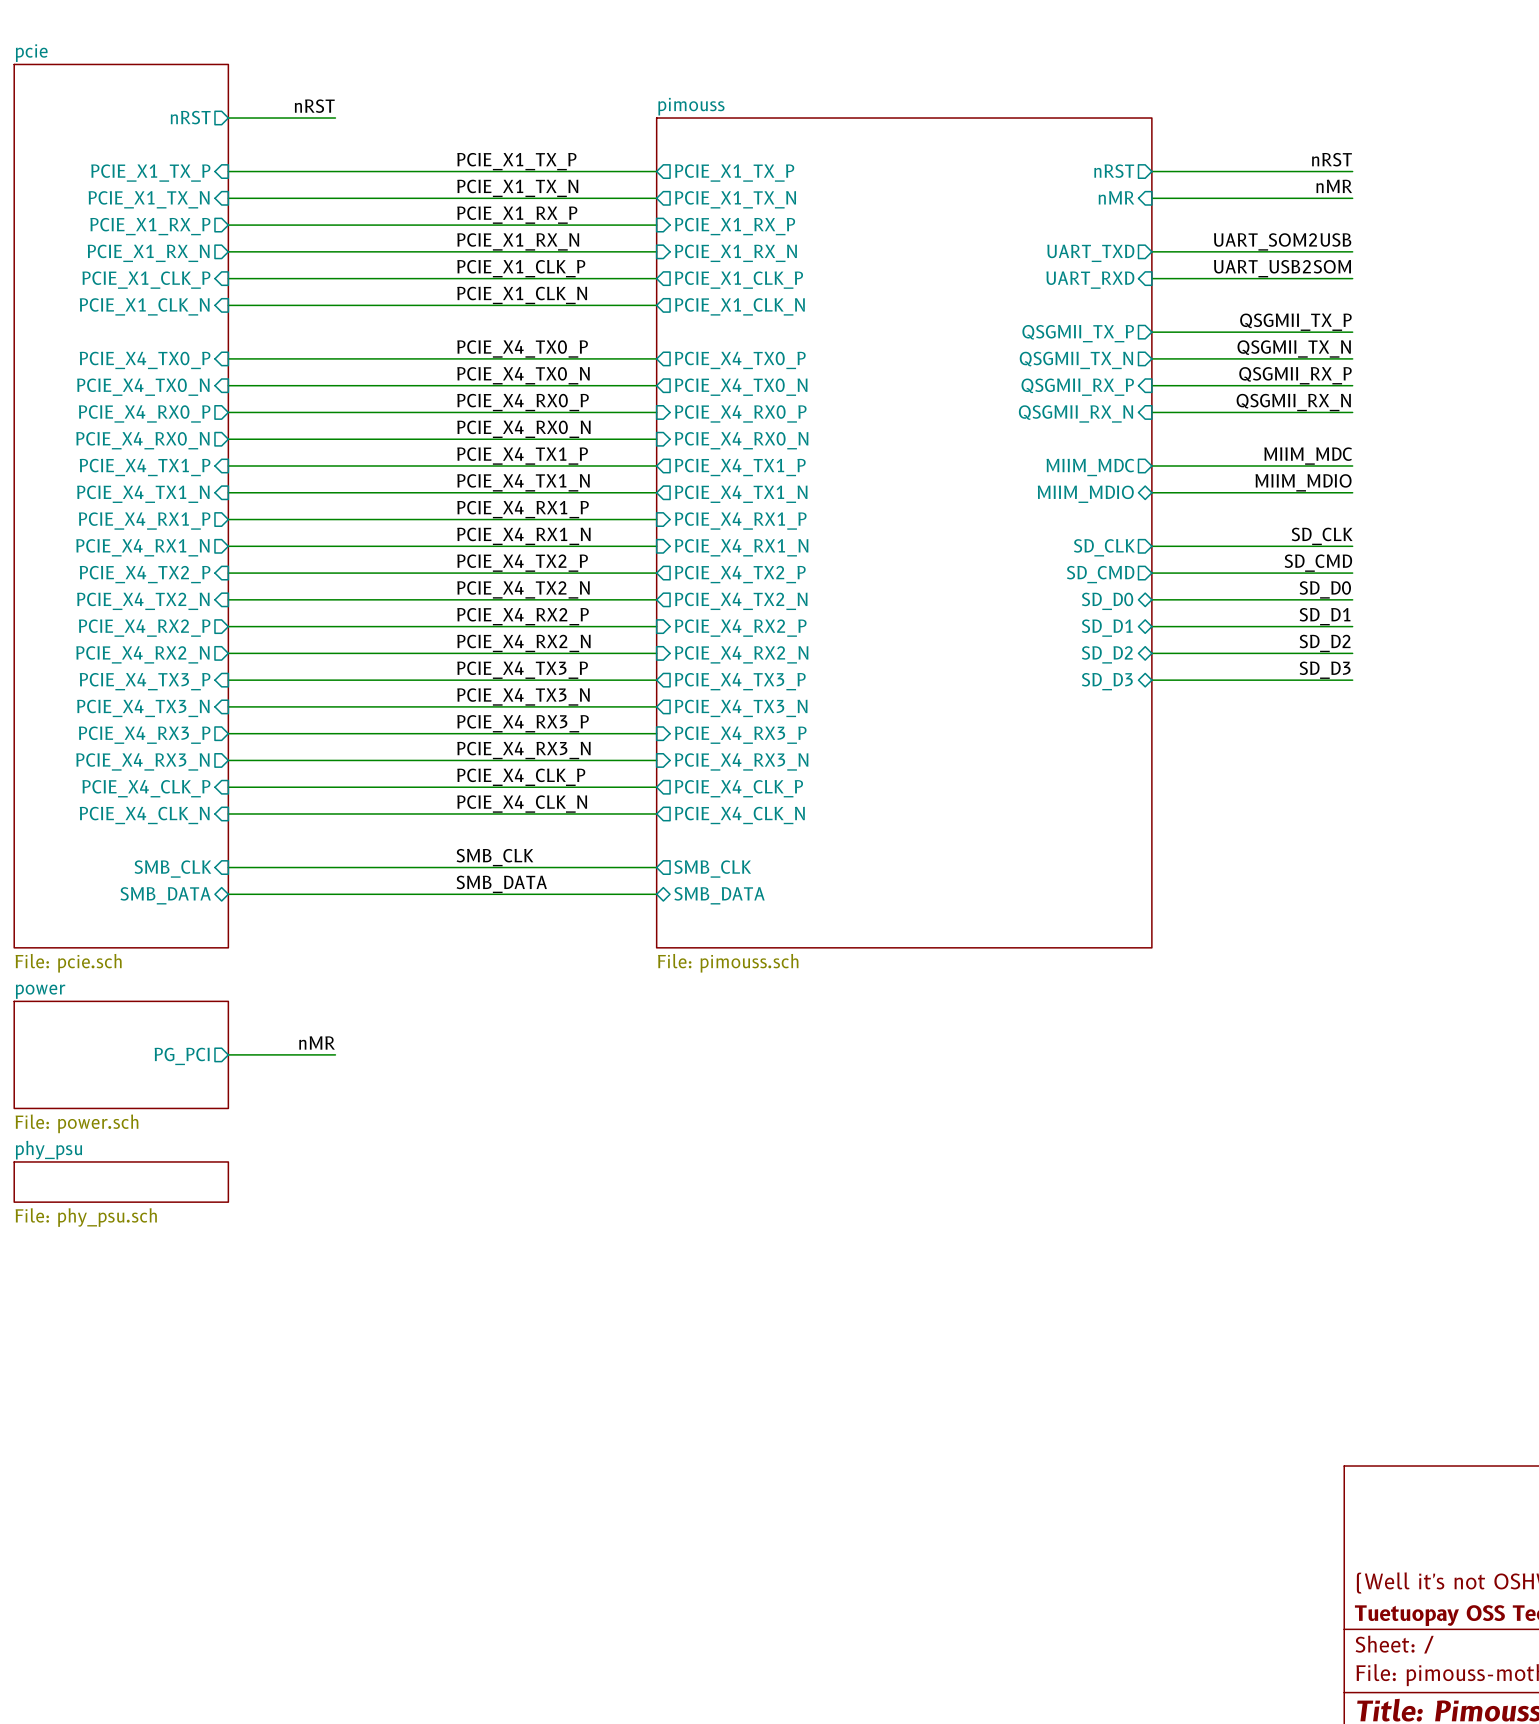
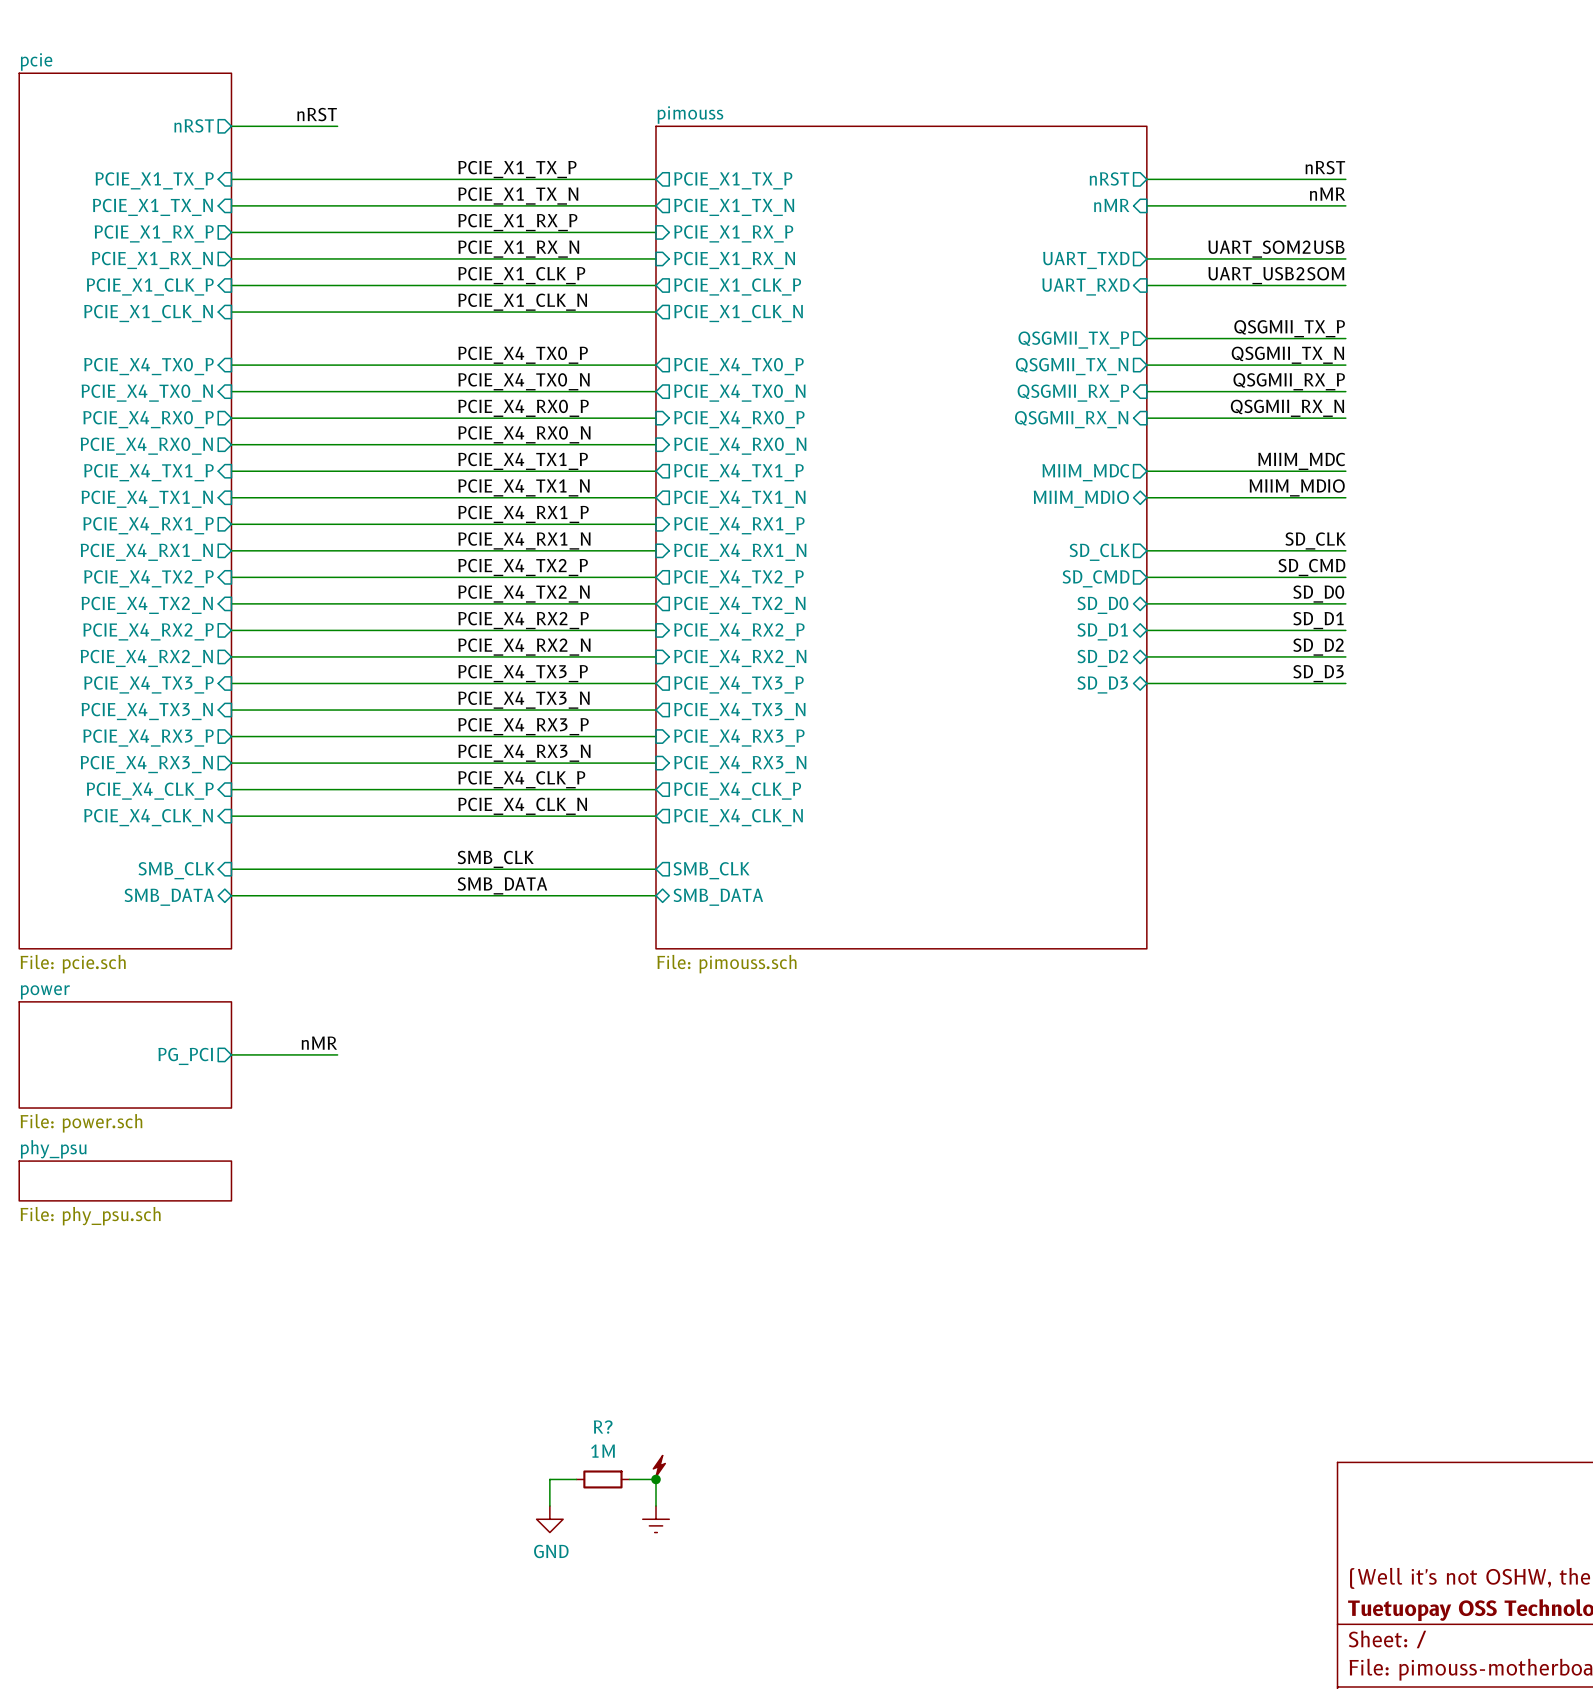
power symbol: none -> (659, 1466)
wire: none -> (576, 1479) (549, 1479) (549, 1506)
R?: none -> 1M (602, 1479)
wire: none -> (629, 1479) (656, 1479) (656, 1506)
junction: none -> (656, 1479)
power symbol: none -> GND (549, 1519)
power symbol: none -> (656, 1519)

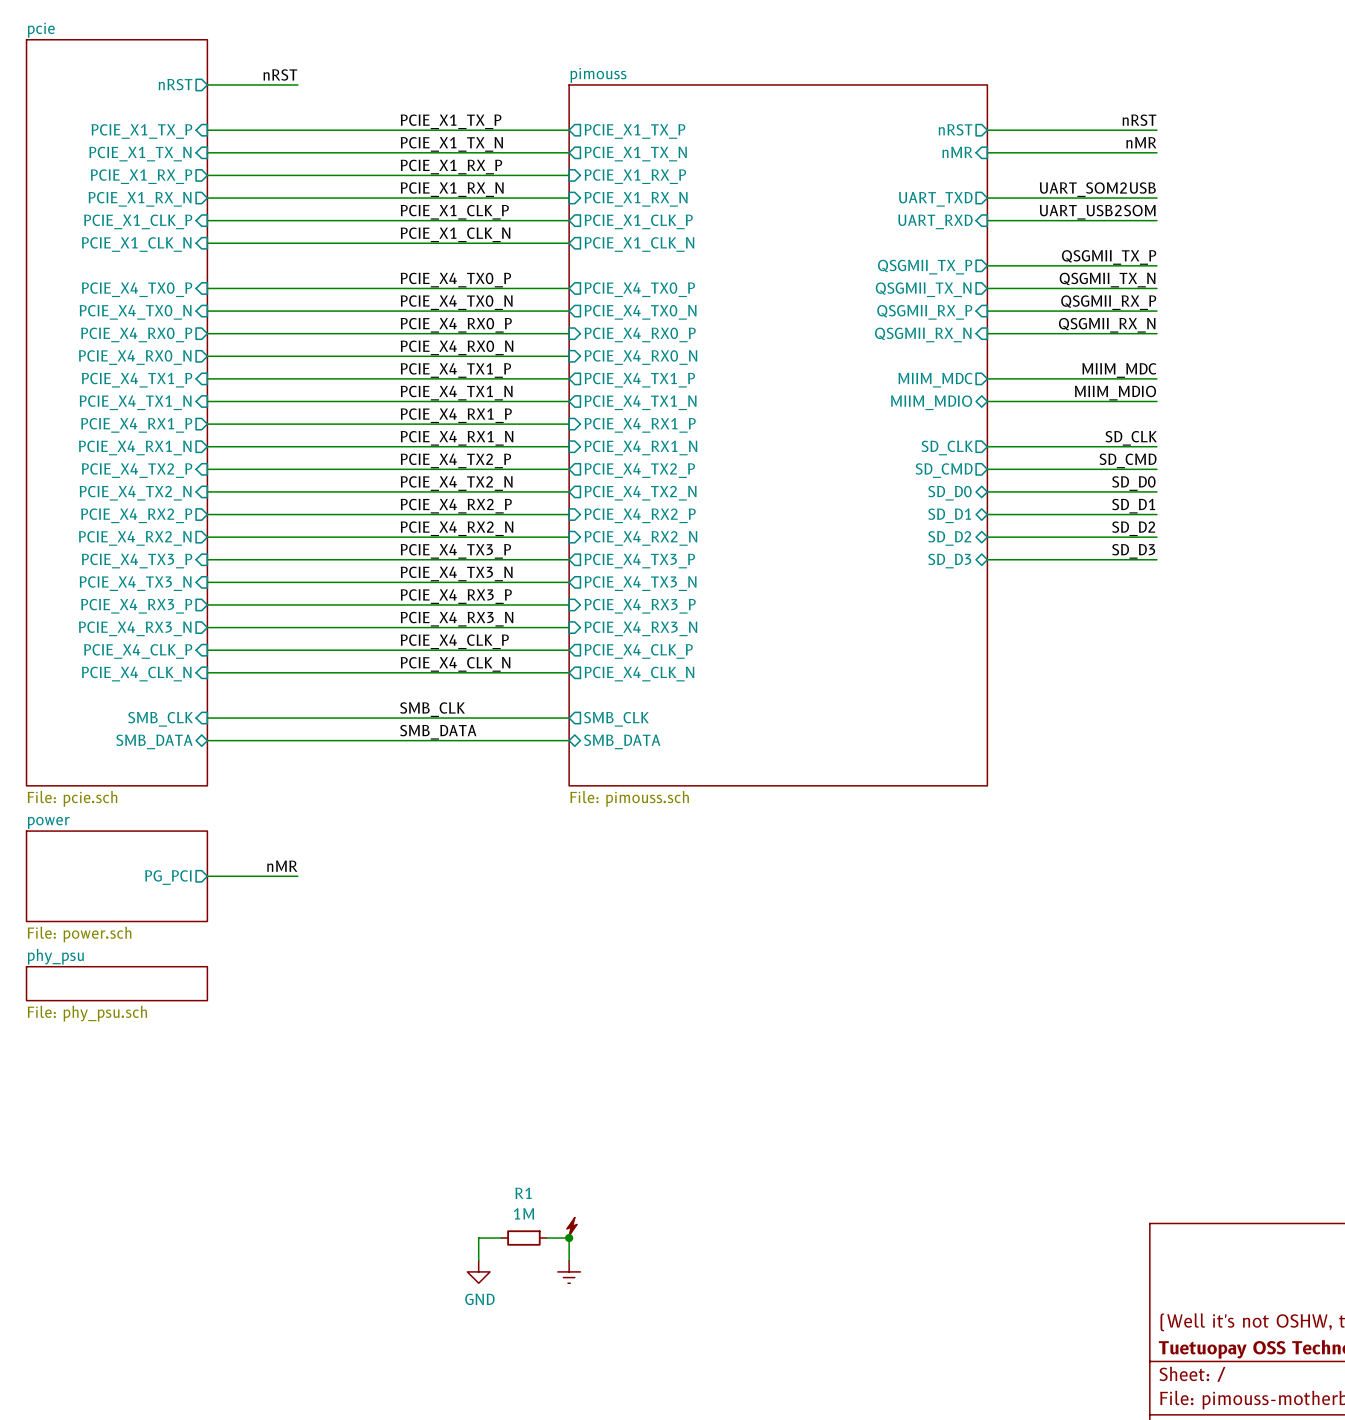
R? name: R? (603, 1427) -> R1 (523, 1193)

